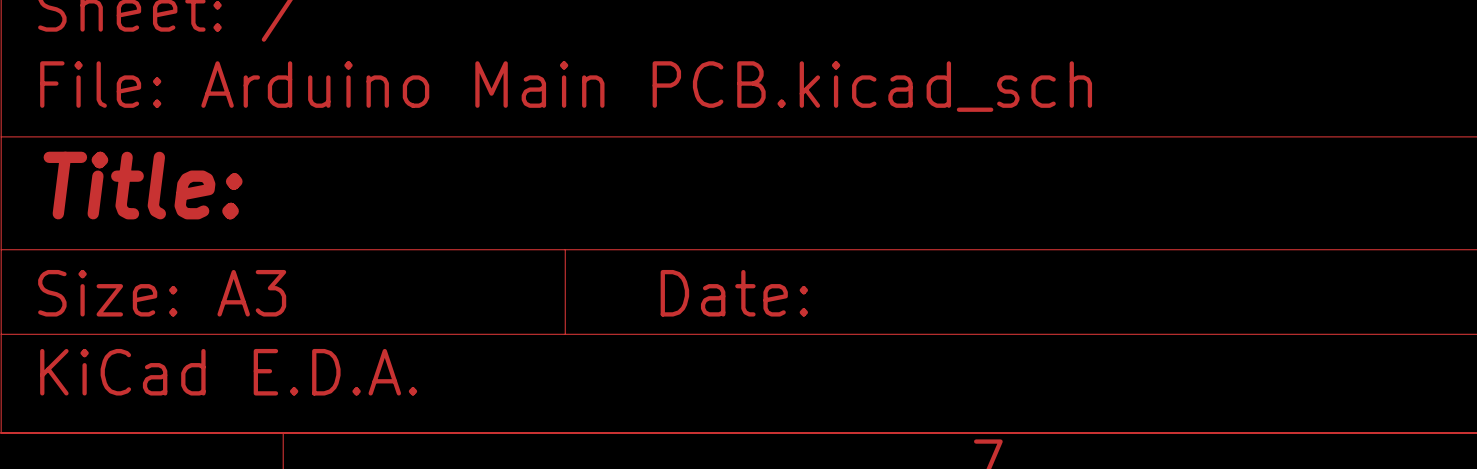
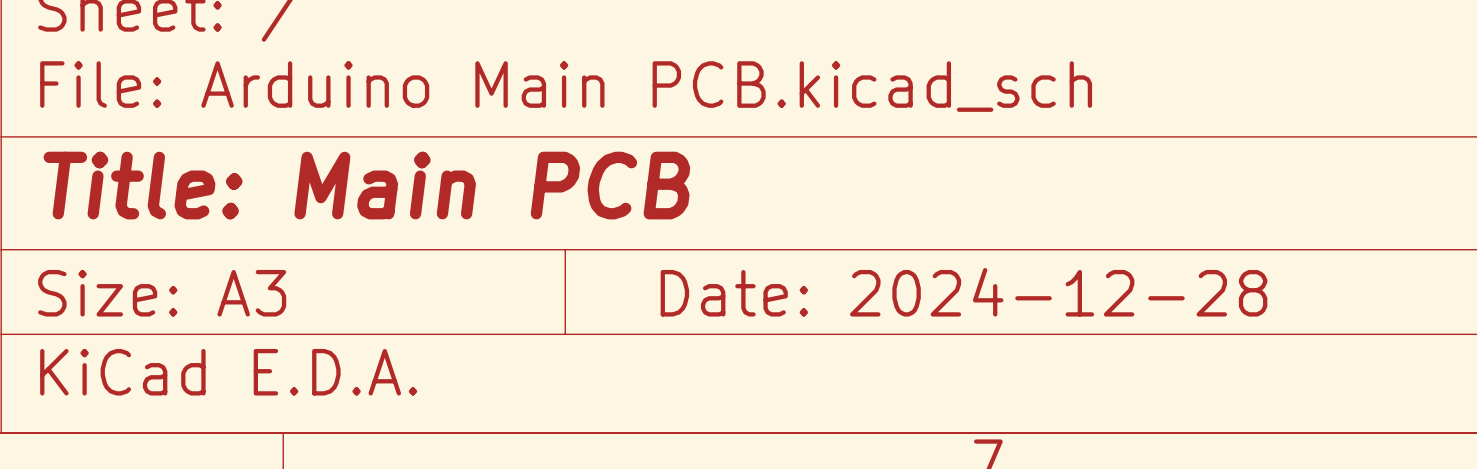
title block: Title: (143, 185) -> Title: Main PCB (366, 185)
title block: Date: (734, 293) -> Date: 2024-12-28 (963, 292)

